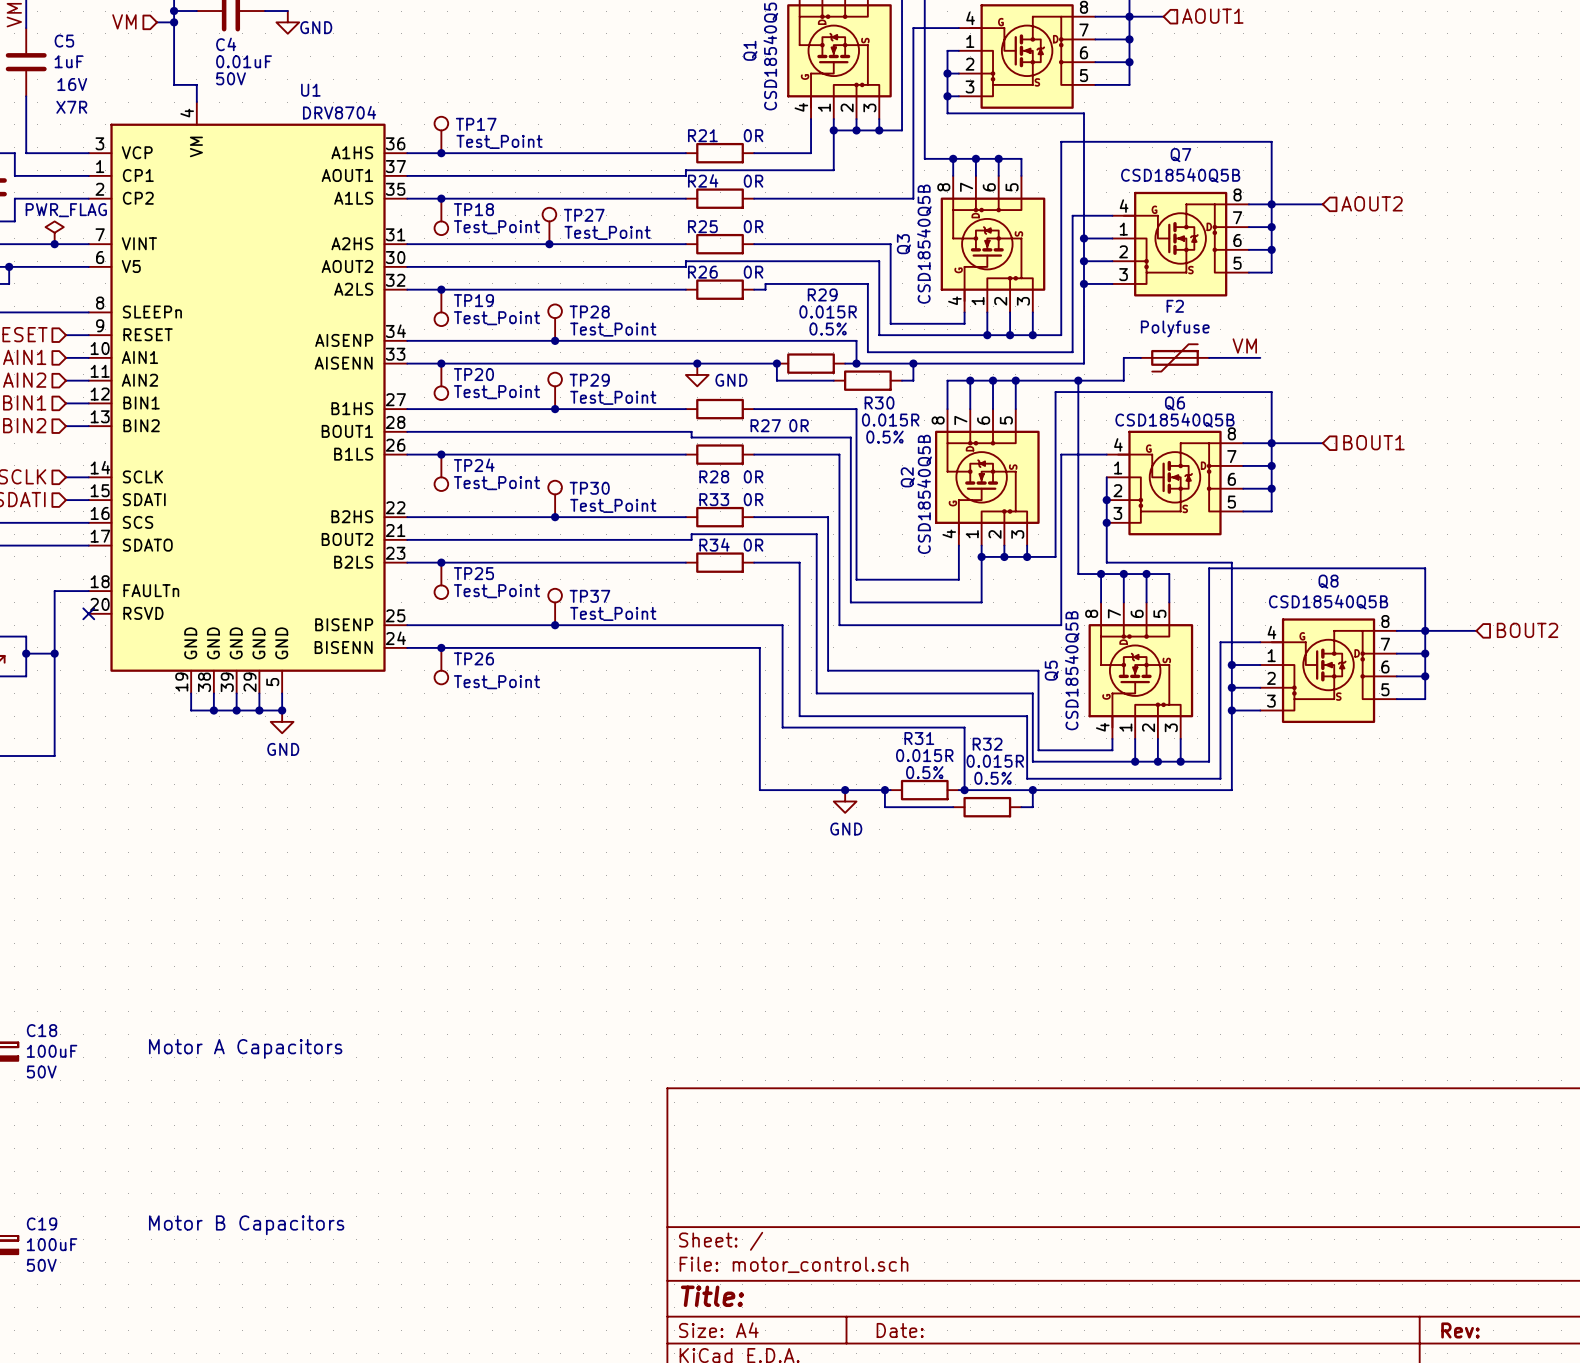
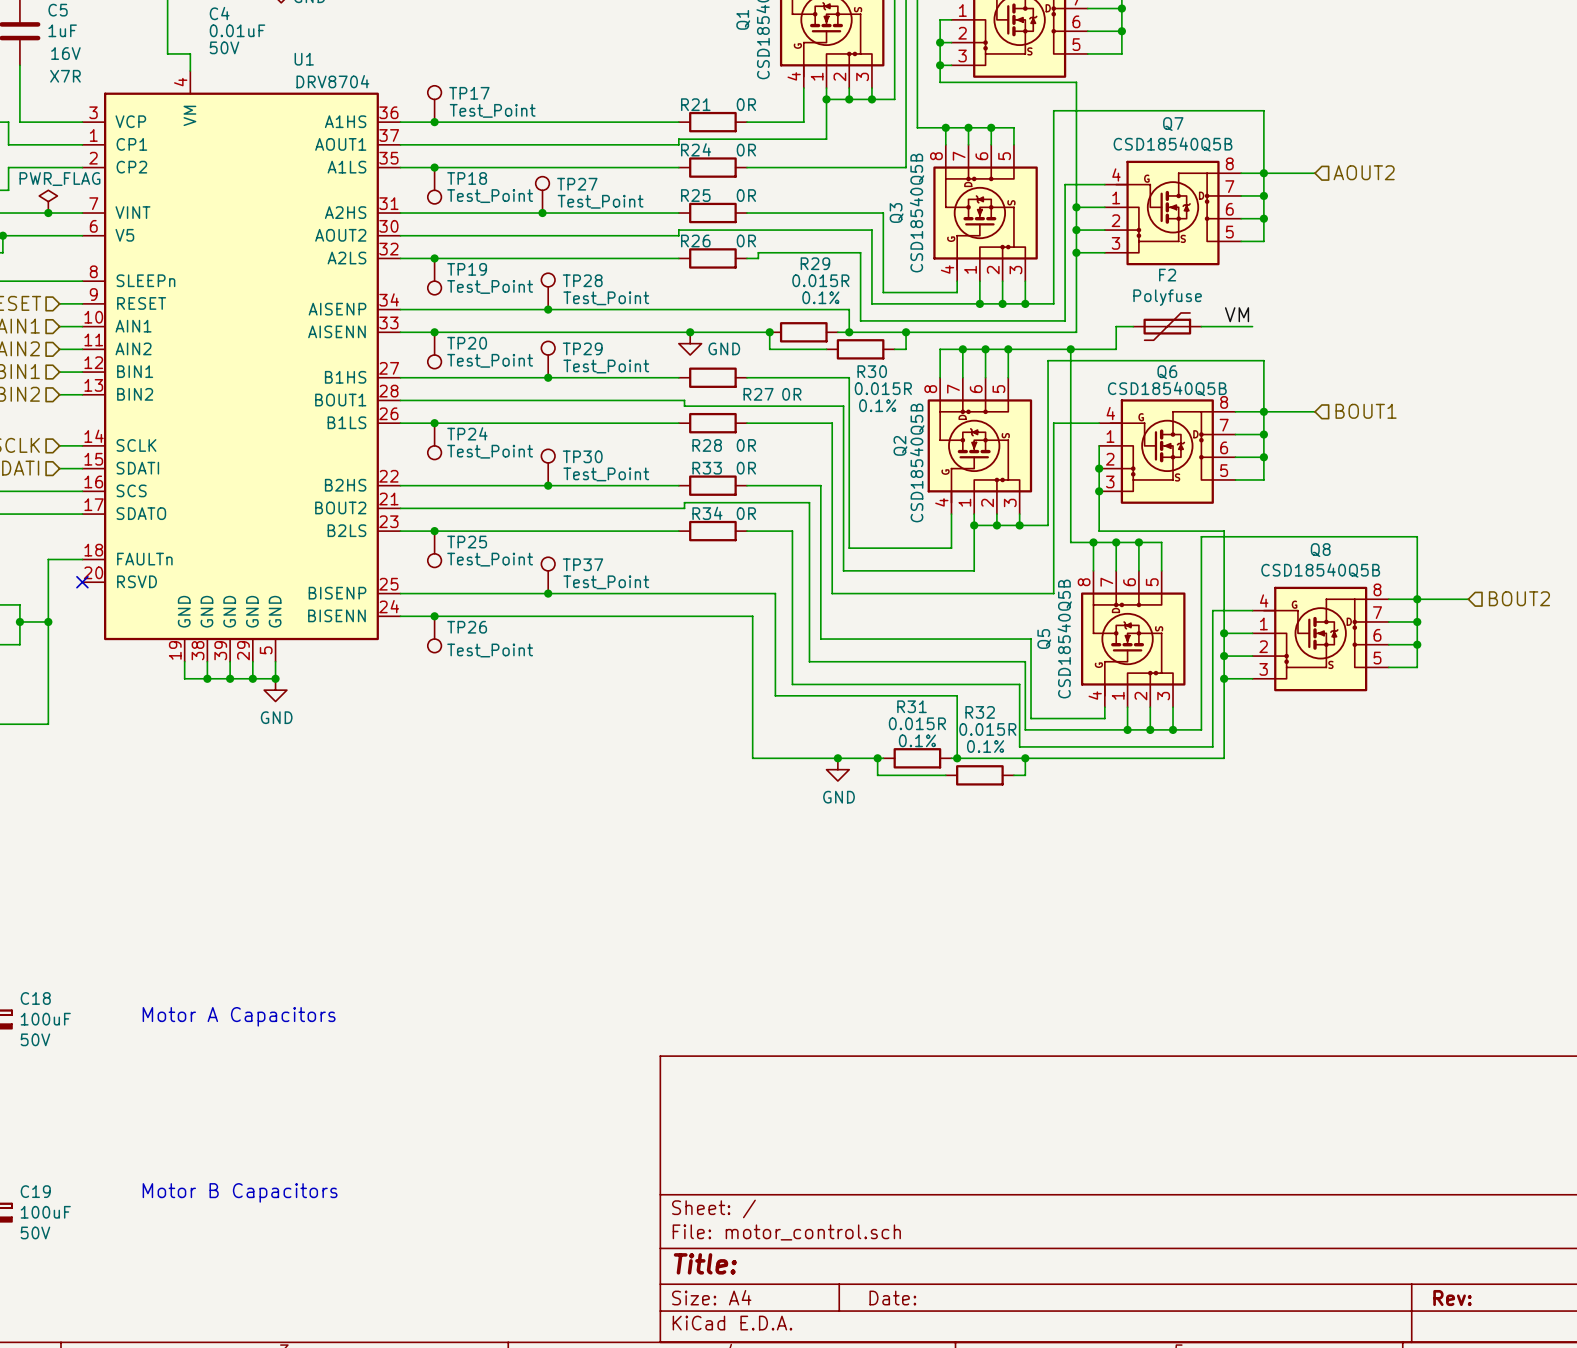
R29 text: 0.5% (828, 329) -> 0.1% (820, 297)
R30 text: 0.5% (884, 437) -> 0.1% (877, 405)
R31 text: 0.5% (924, 772) -> 0.1% (917, 740)
R32 text: 0.5% (993, 778) -> 0.1% (985, 746)

